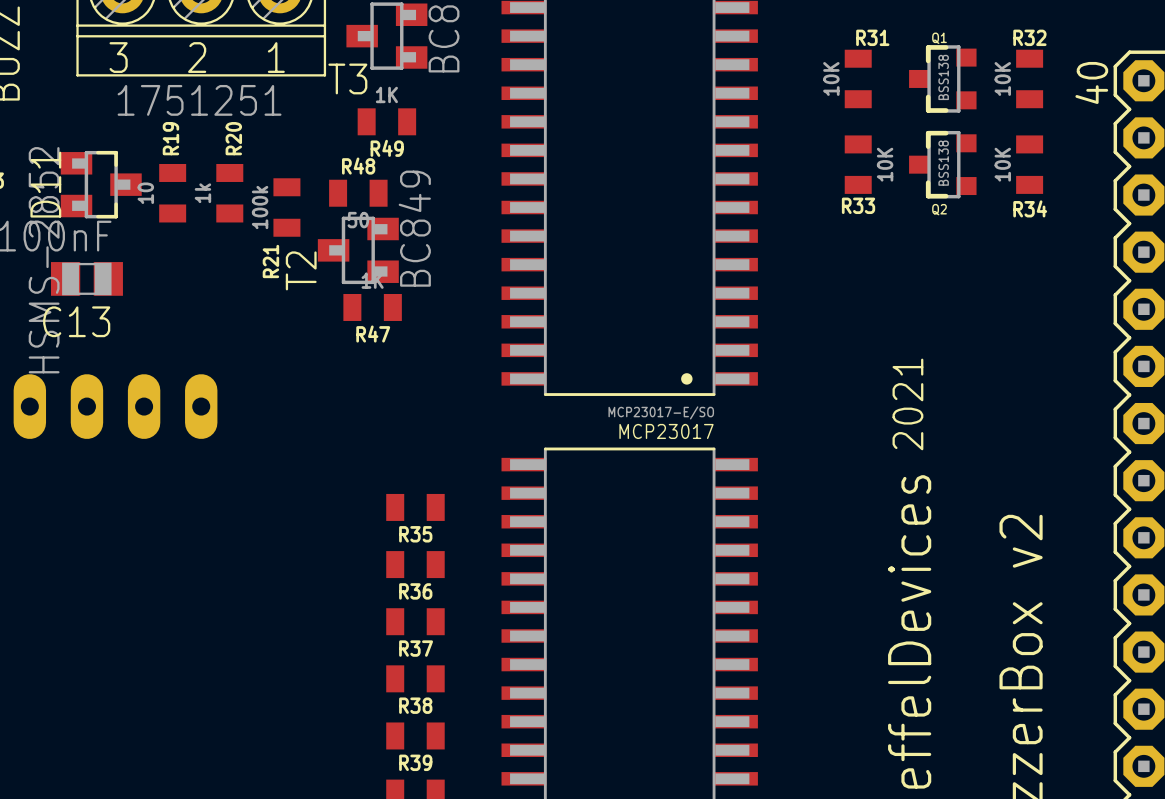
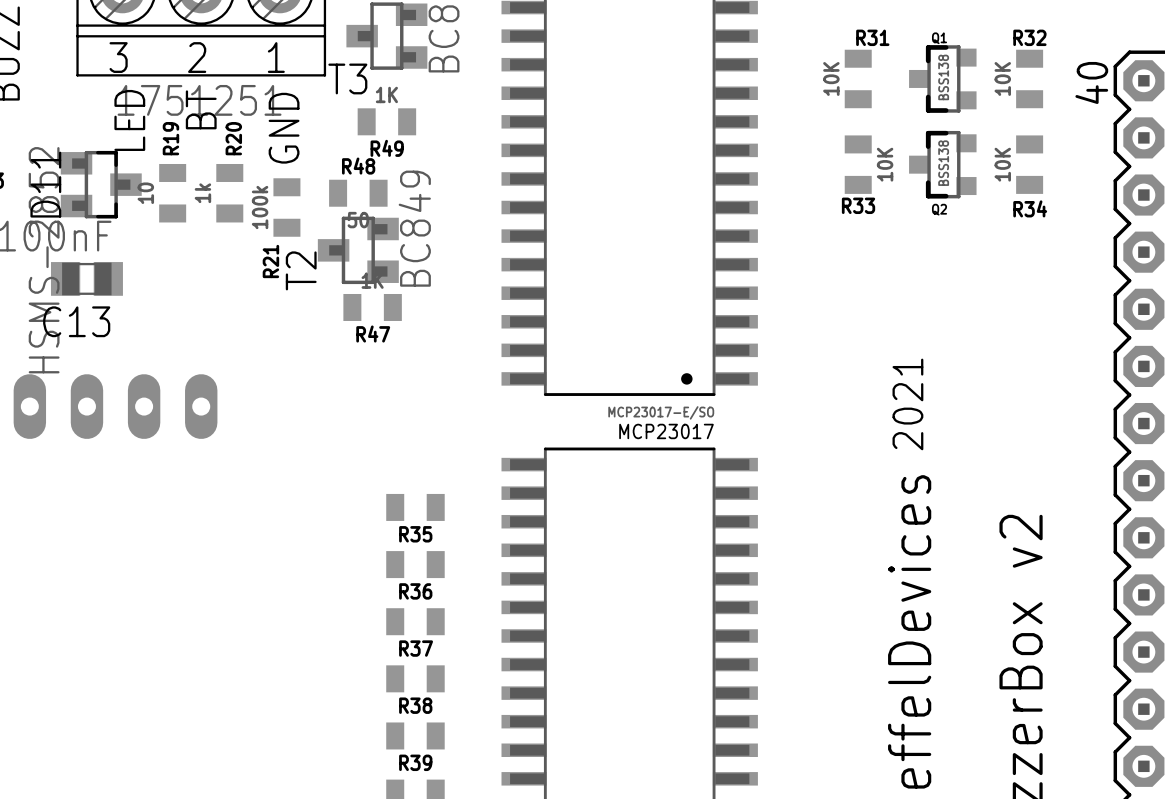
part text: none -> BT (201, 109)
part text: none -> LED (129, 120)
part text: none -> GND (284, 128)

